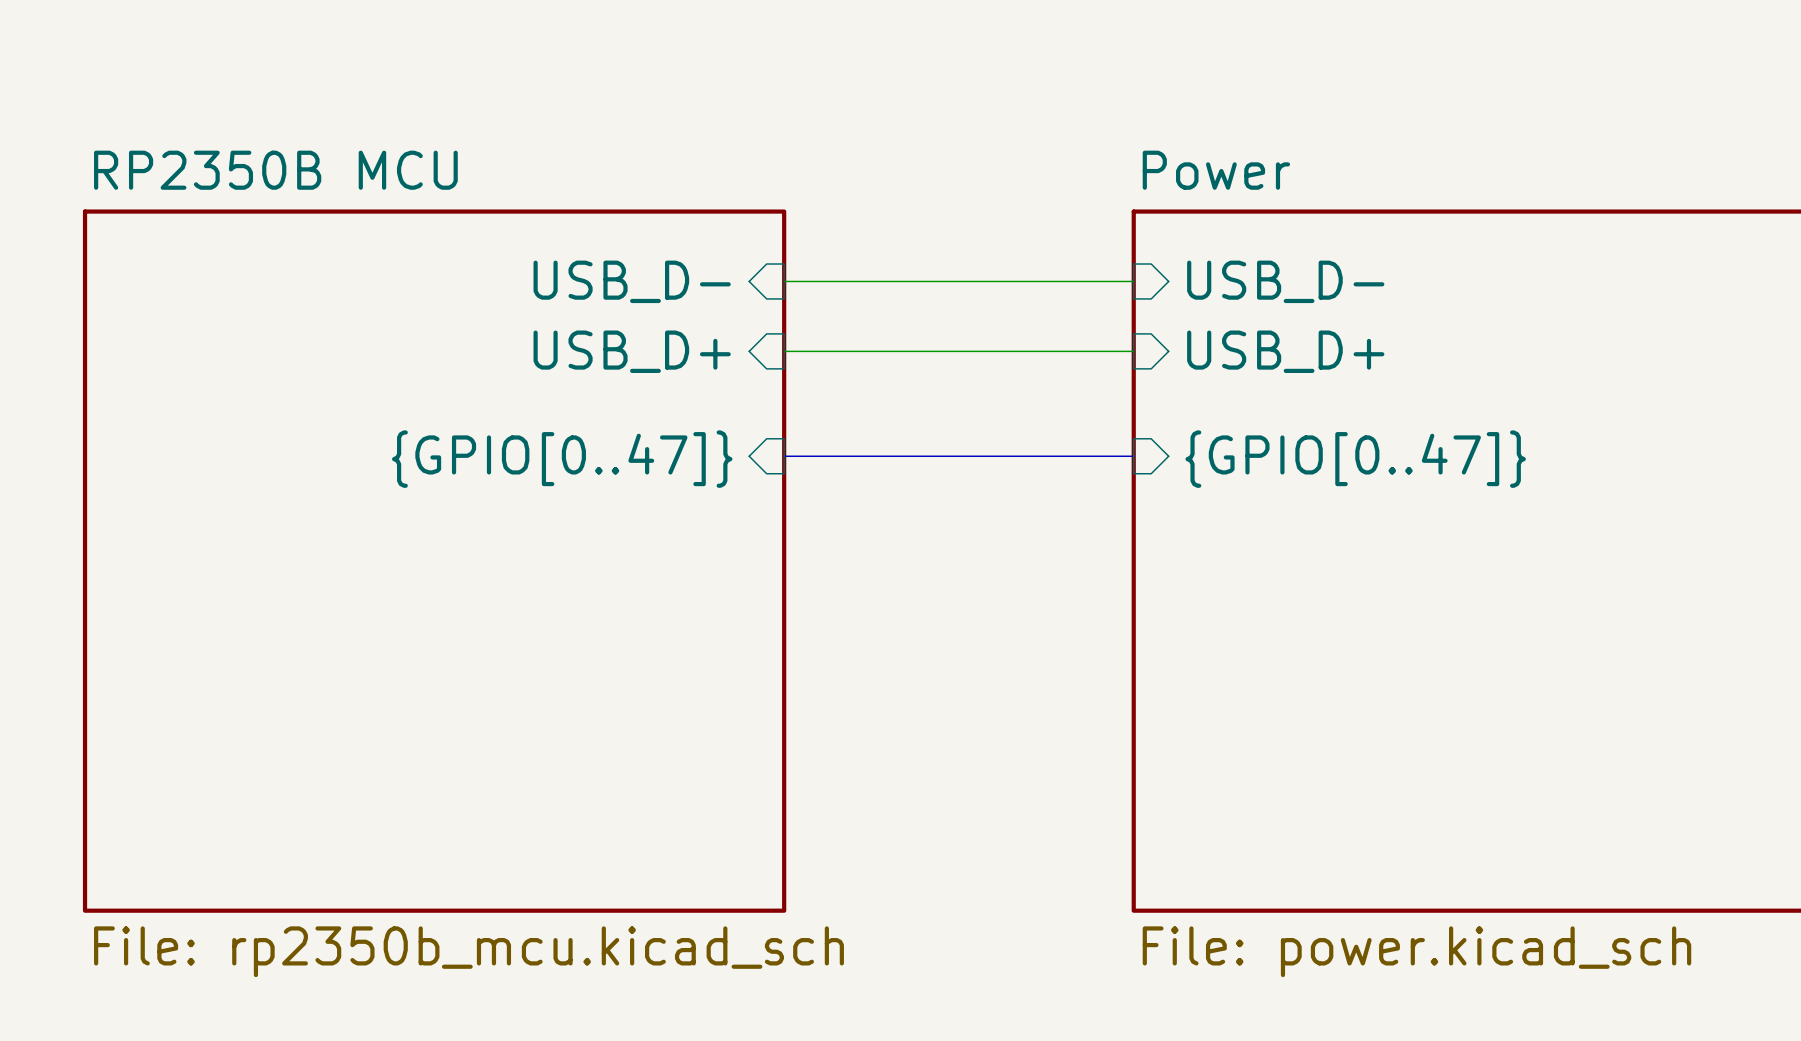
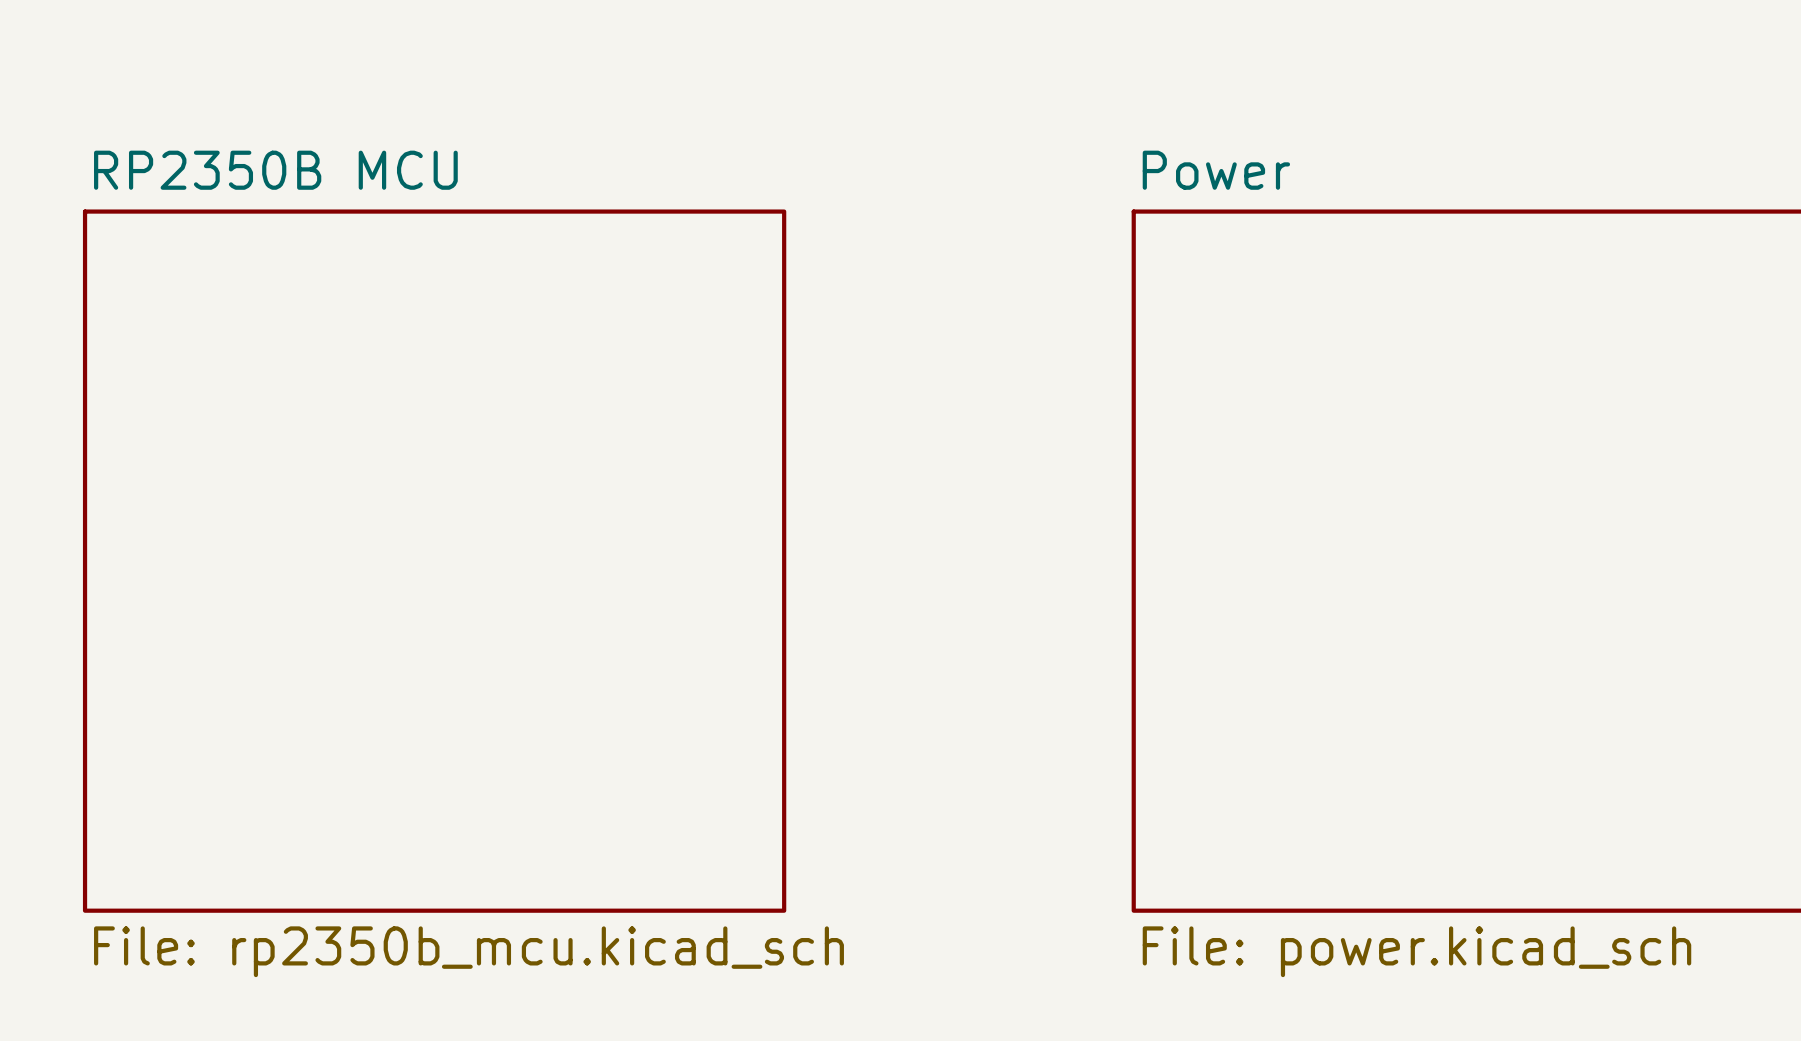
sheet pin: USB_D- (632, 281) -> none
wire: (784, 281) (1133, 281) -> none
sheet pin: USB_D- (1285, 281) -> none
sheet pin: USB_D+ (632, 351) -> none
wire: (784, 351) (1133, 351) -> none
sheet pin: USB_D+ (1285, 351) -> none
bus: (784, 456) (1133, 456) -> none
sheet pin: {GPIO[0..47]} (562, 459) -> none
sheet pin: {GPIO[0..47]} (1355, 459) -> none

